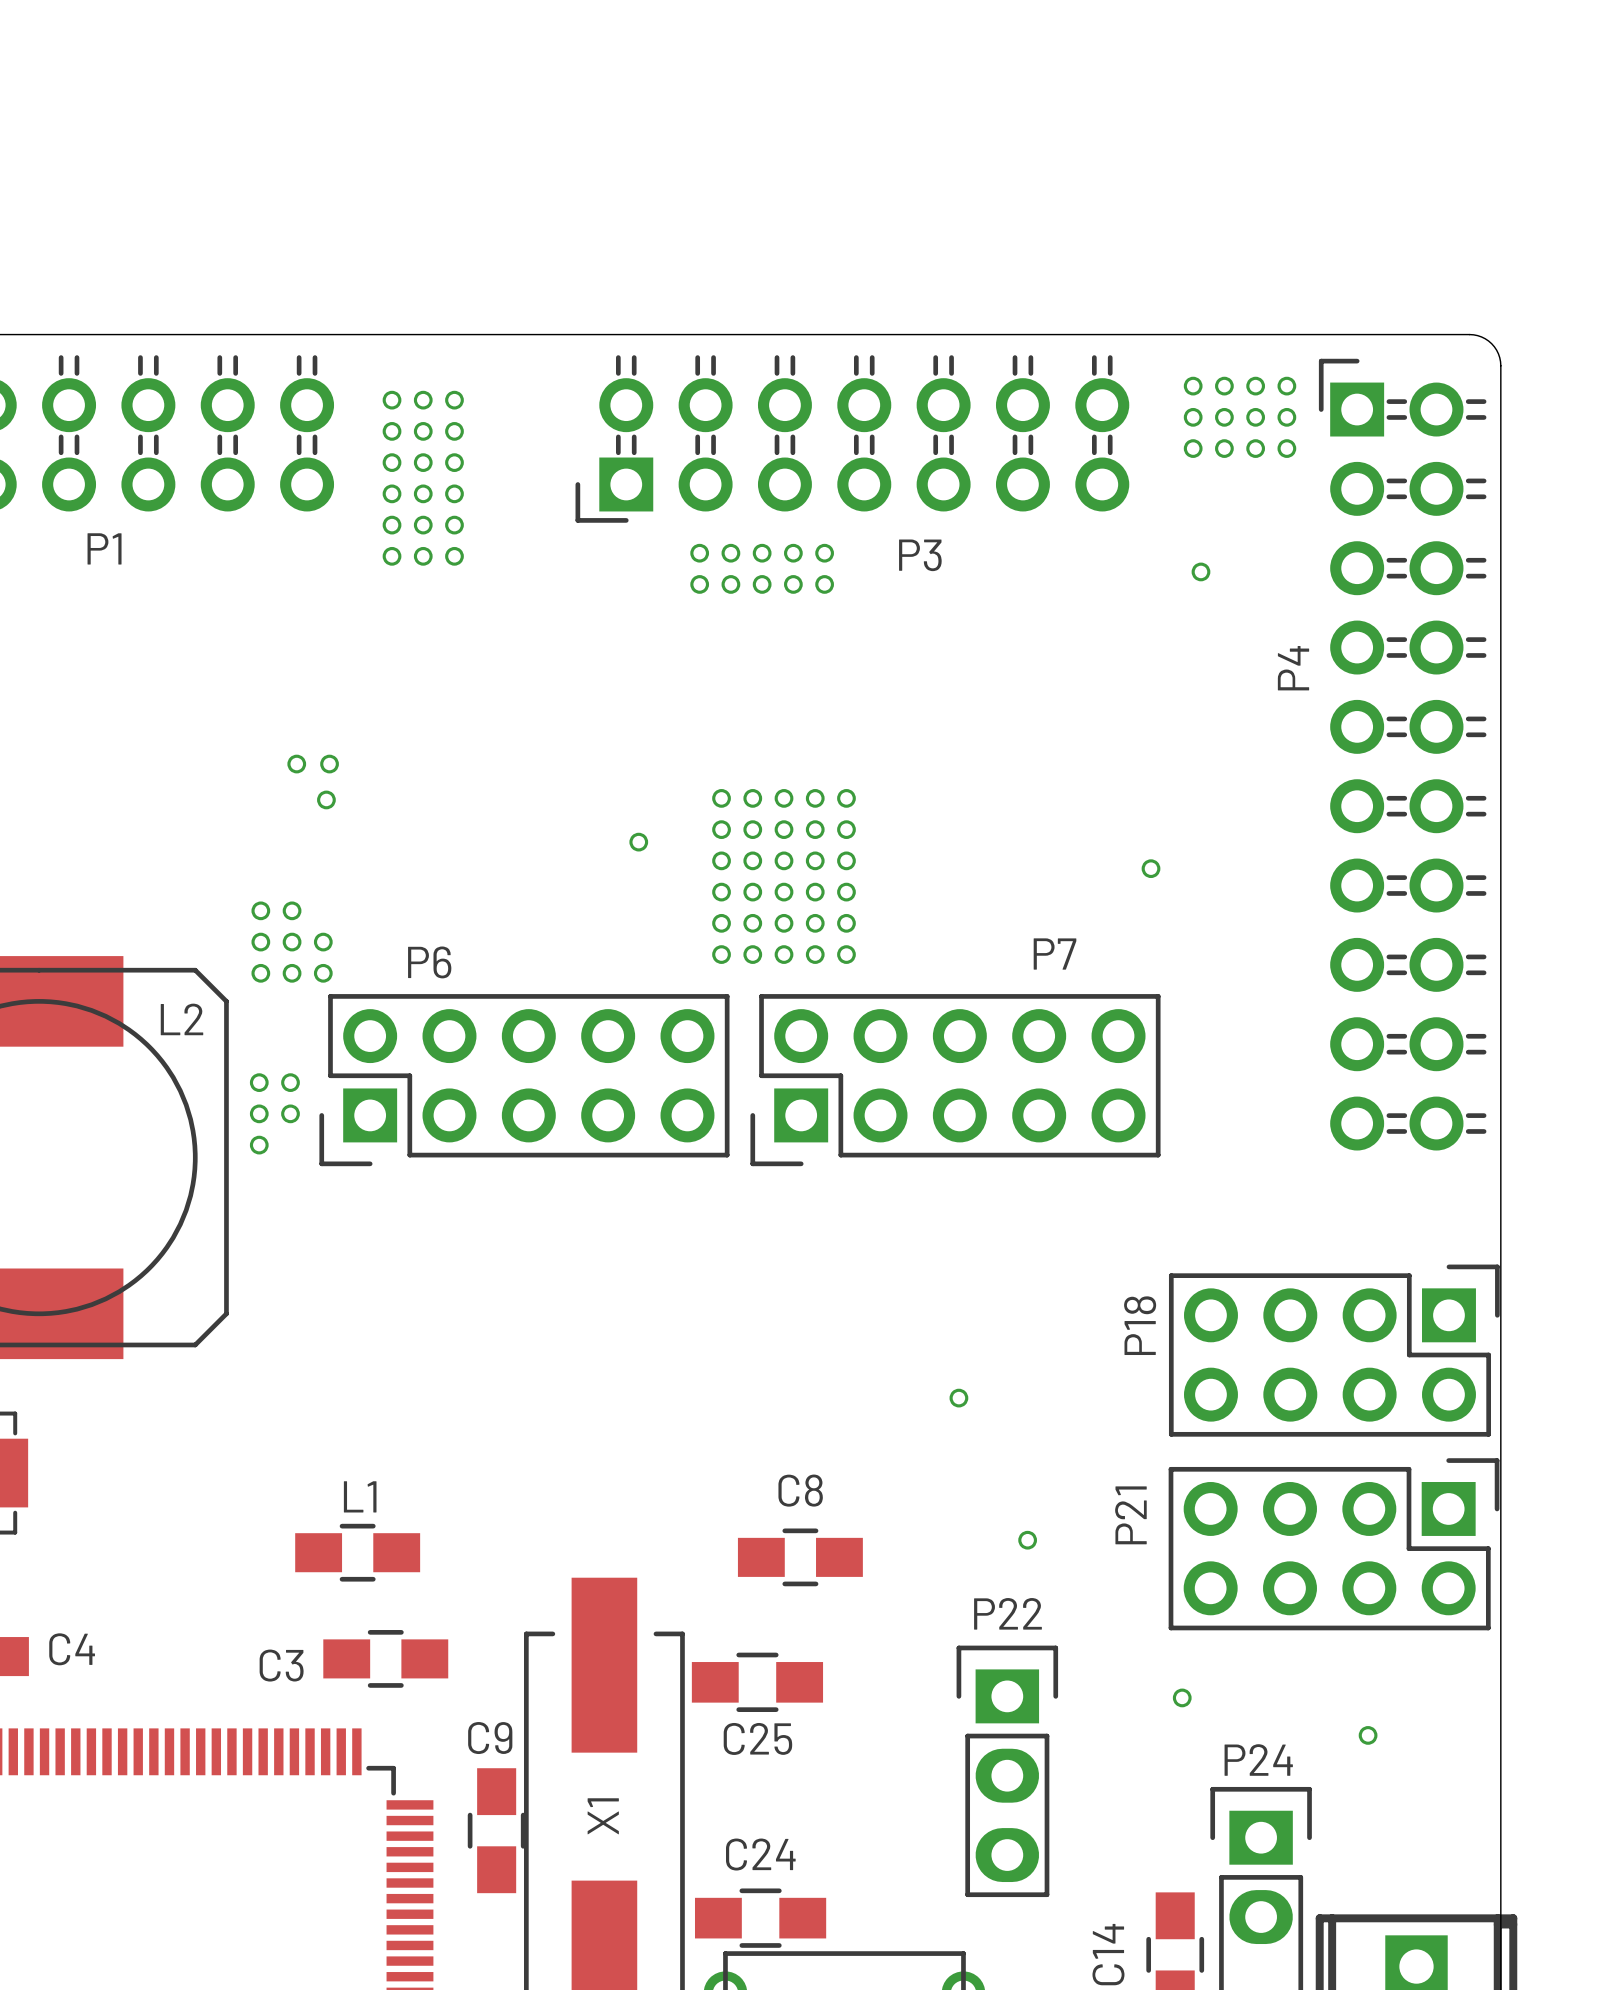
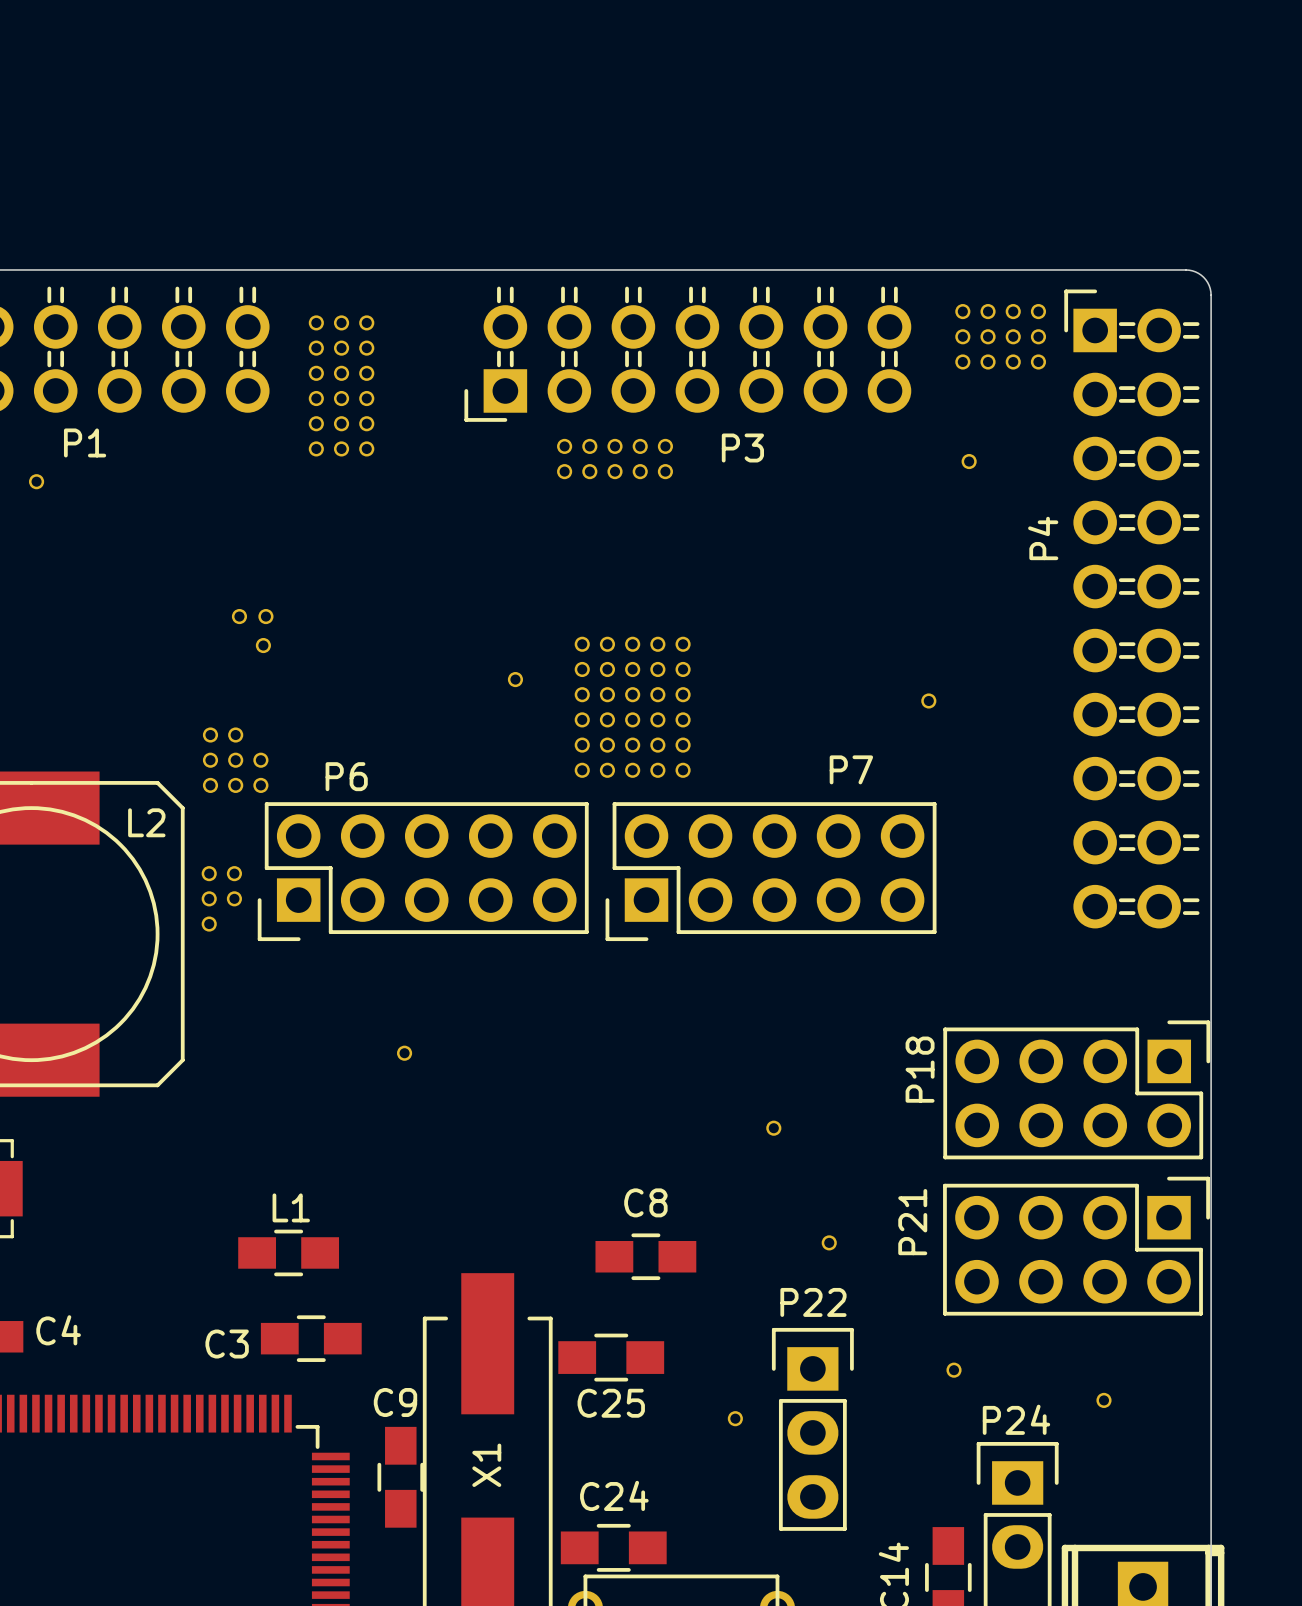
part: none -> (36, 481)
part: none -> (404, 1053)
part: none -> (735, 1418)

